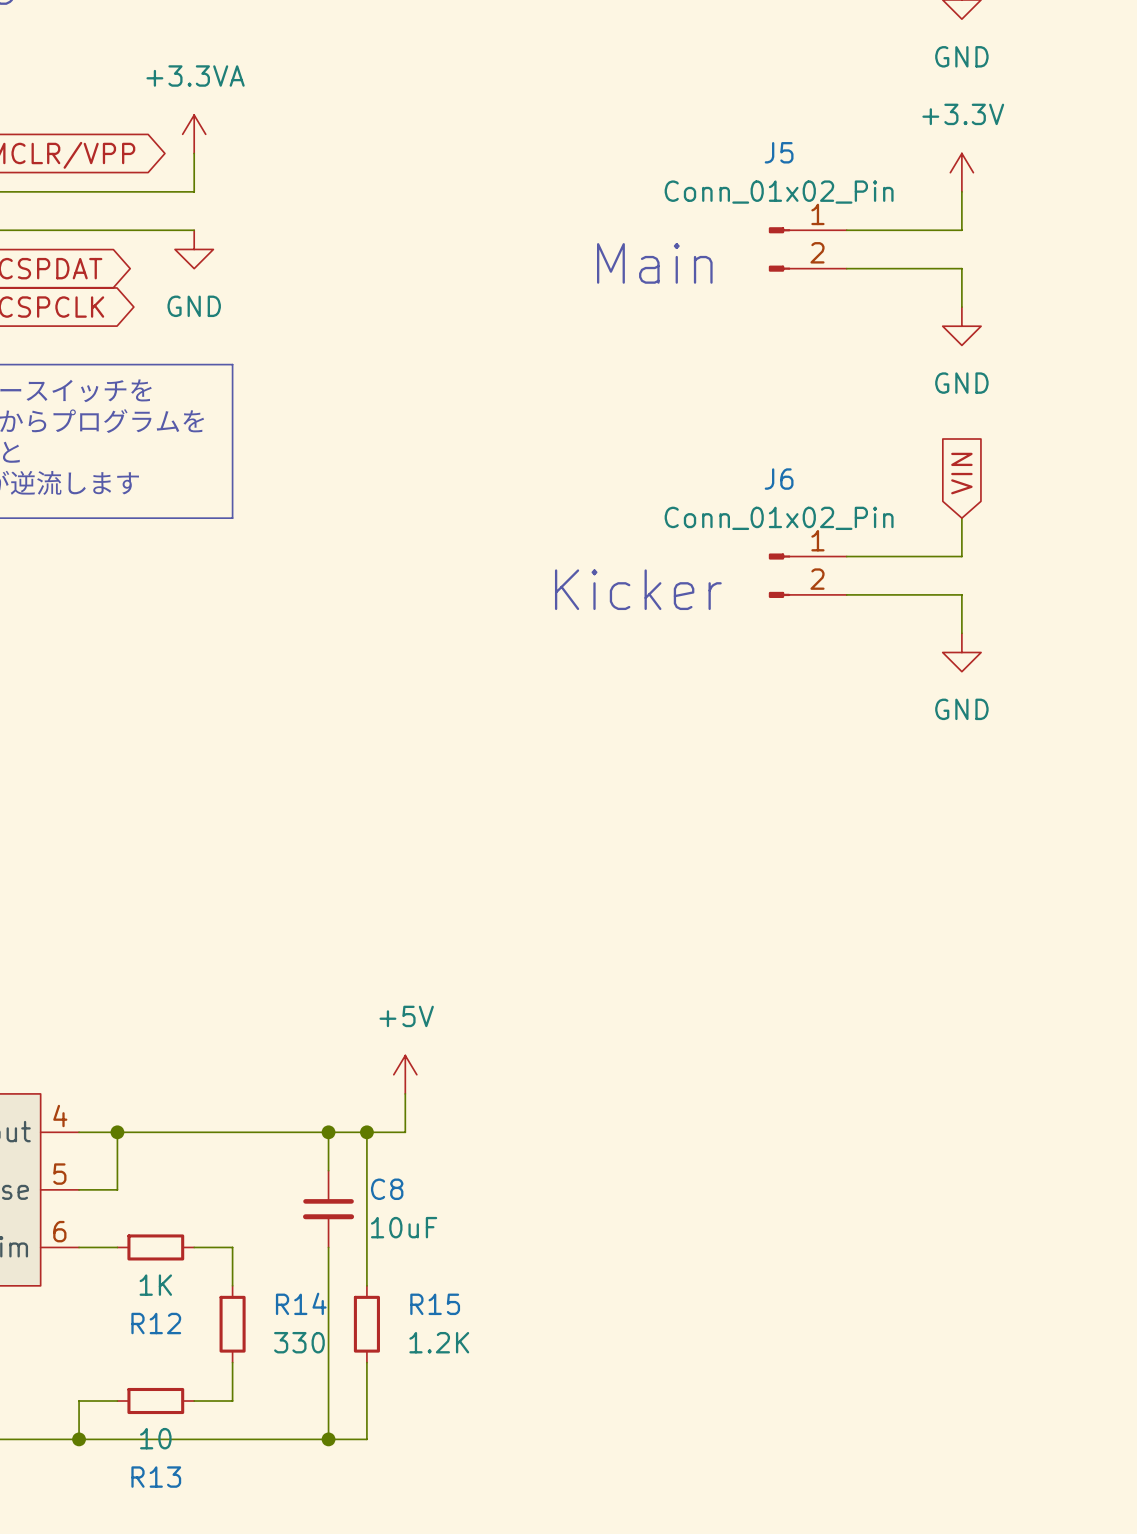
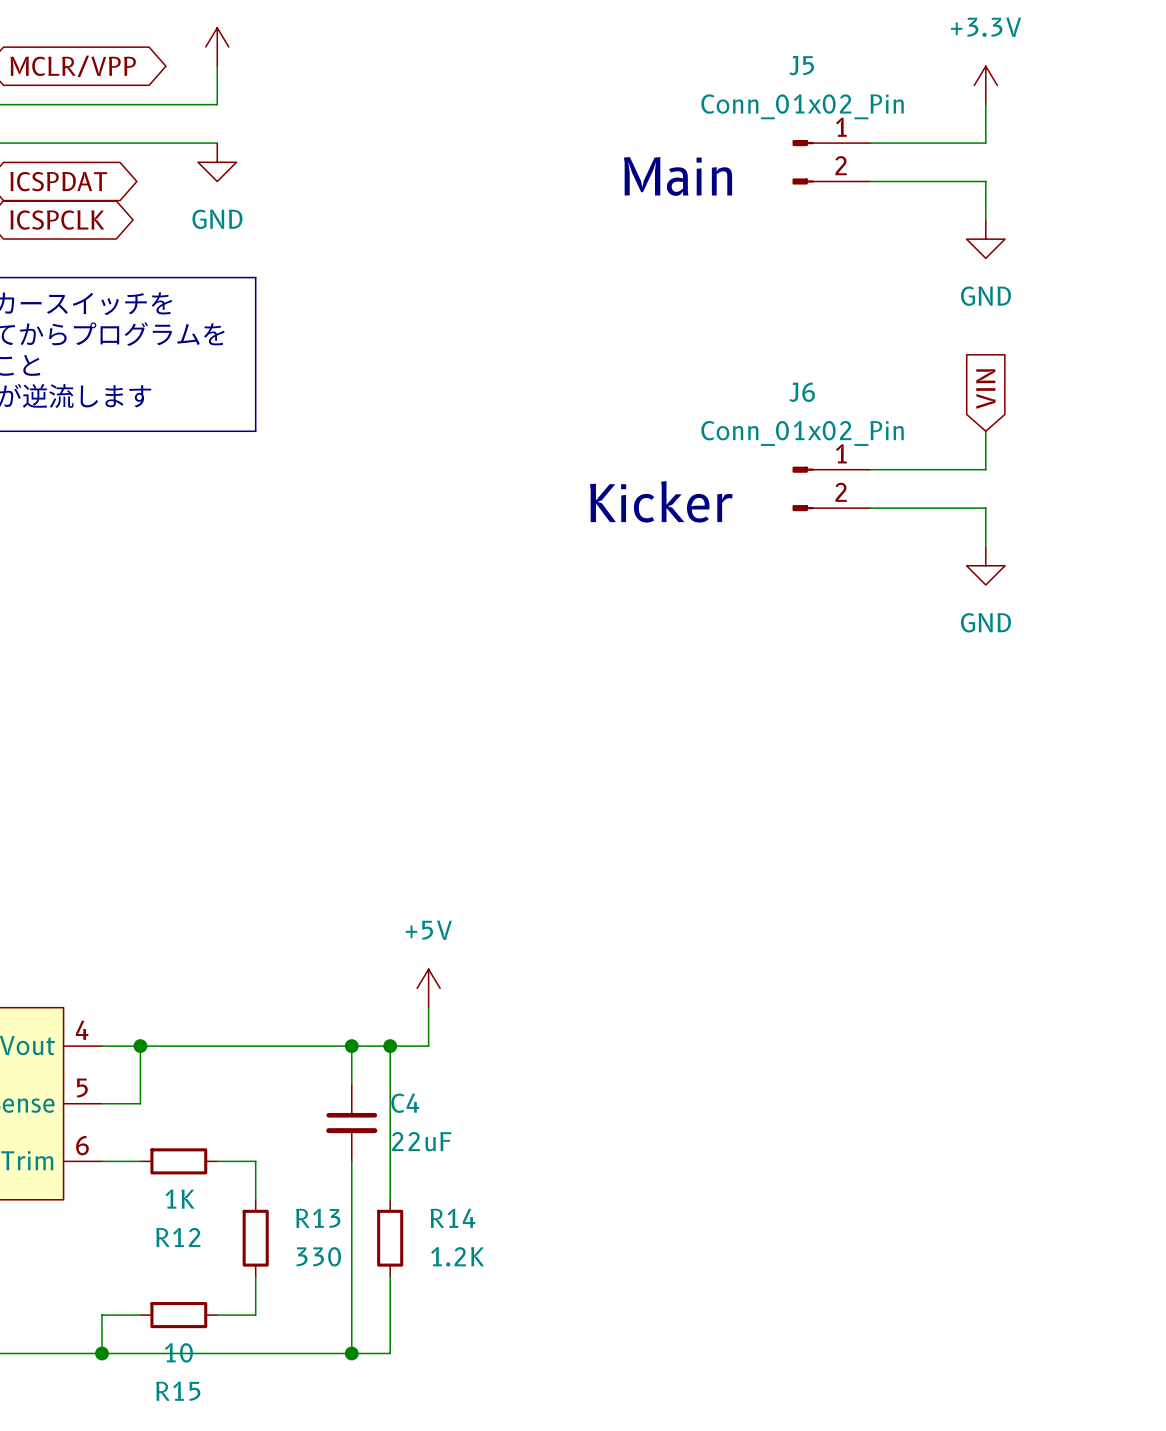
C8 name: C8 (387, 1189) -> C4 (405, 1103)
C8 value: 10uF (404, 1227) -> 22uF (421, 1141)
R14 name: R14 (301, 1303) -> R13 (318, 1218)
R15 name: R15 (435, 1304) -> R14 (452, 1218)
R13 name: R13 (156, 1477) -> R15 (178, 1391)

